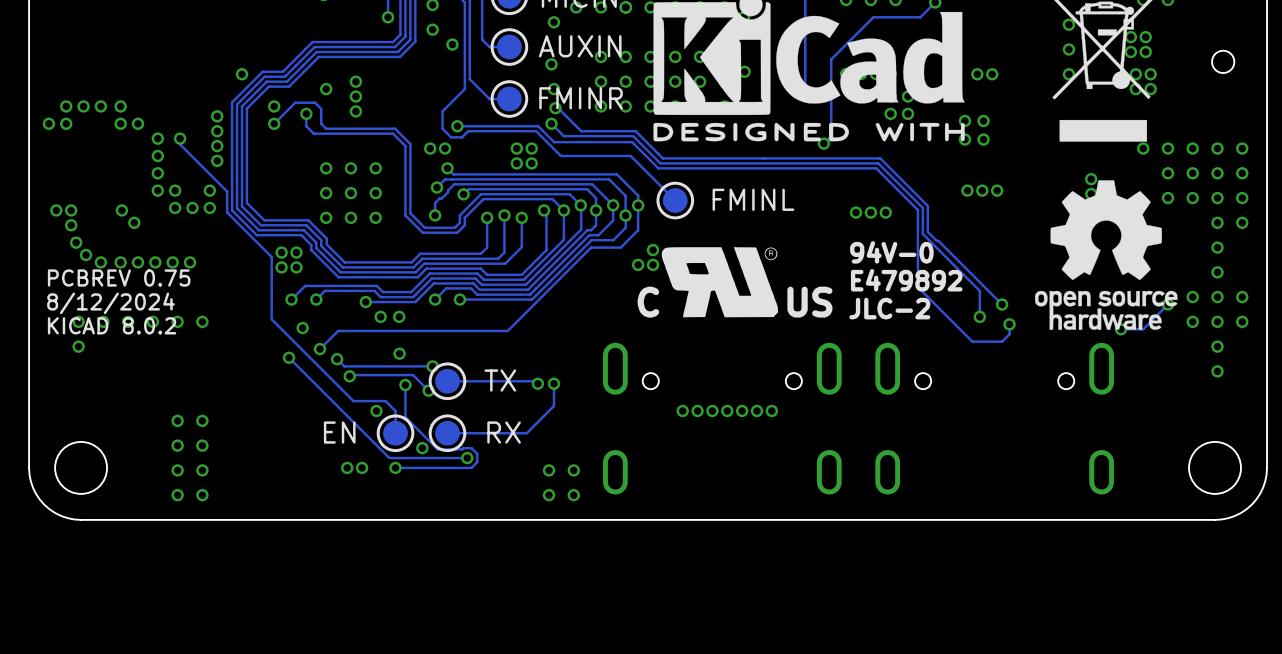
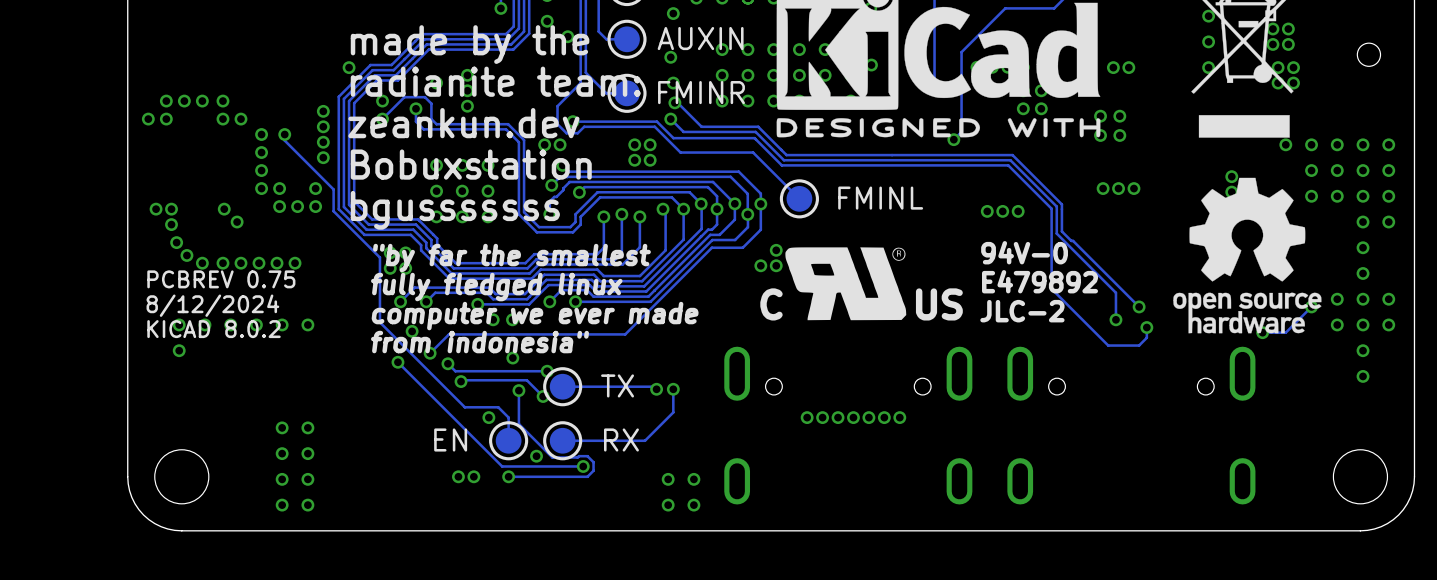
text: none -> made by the (470, 44)
text: none -> radianite team: (495, 81)
text: none -> zeankun.dev (463, 123)
text: none -> Bobuxstation (471, 164)
text: none -> bgusssssss (455, 210)
text: none -> "by far the smallest (511, 258)
text: none -> fully fledged linux (496, 287)
text: none -> computer we ever made (535, 316)
text: none -> from indonesia" (480, 342)

